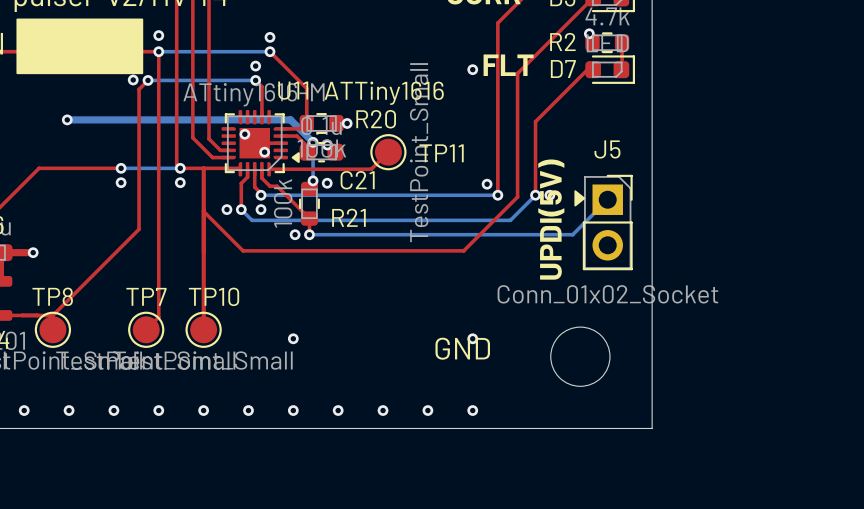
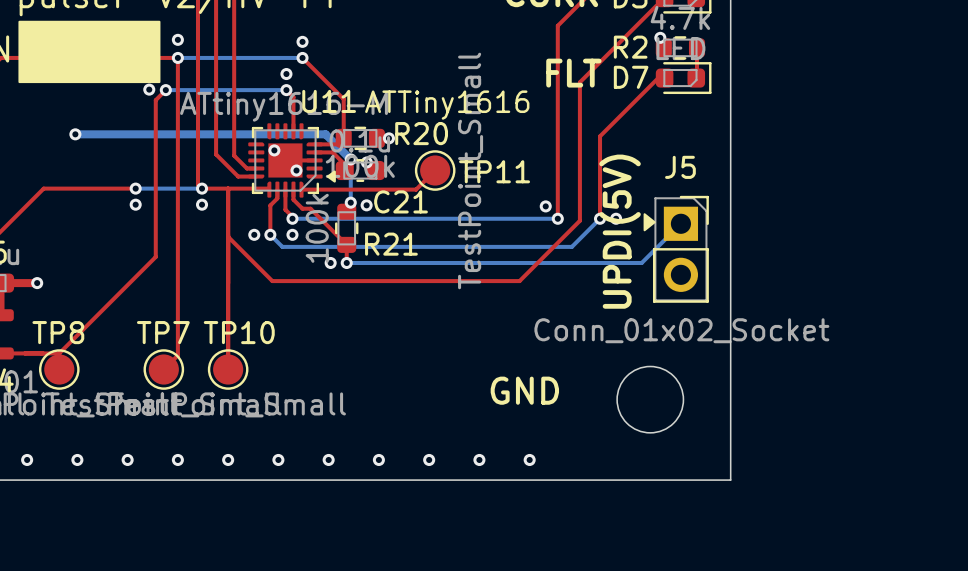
via: (472, 69) -> none
via: (293, 338) -> none
via: (472, 338) -> none

